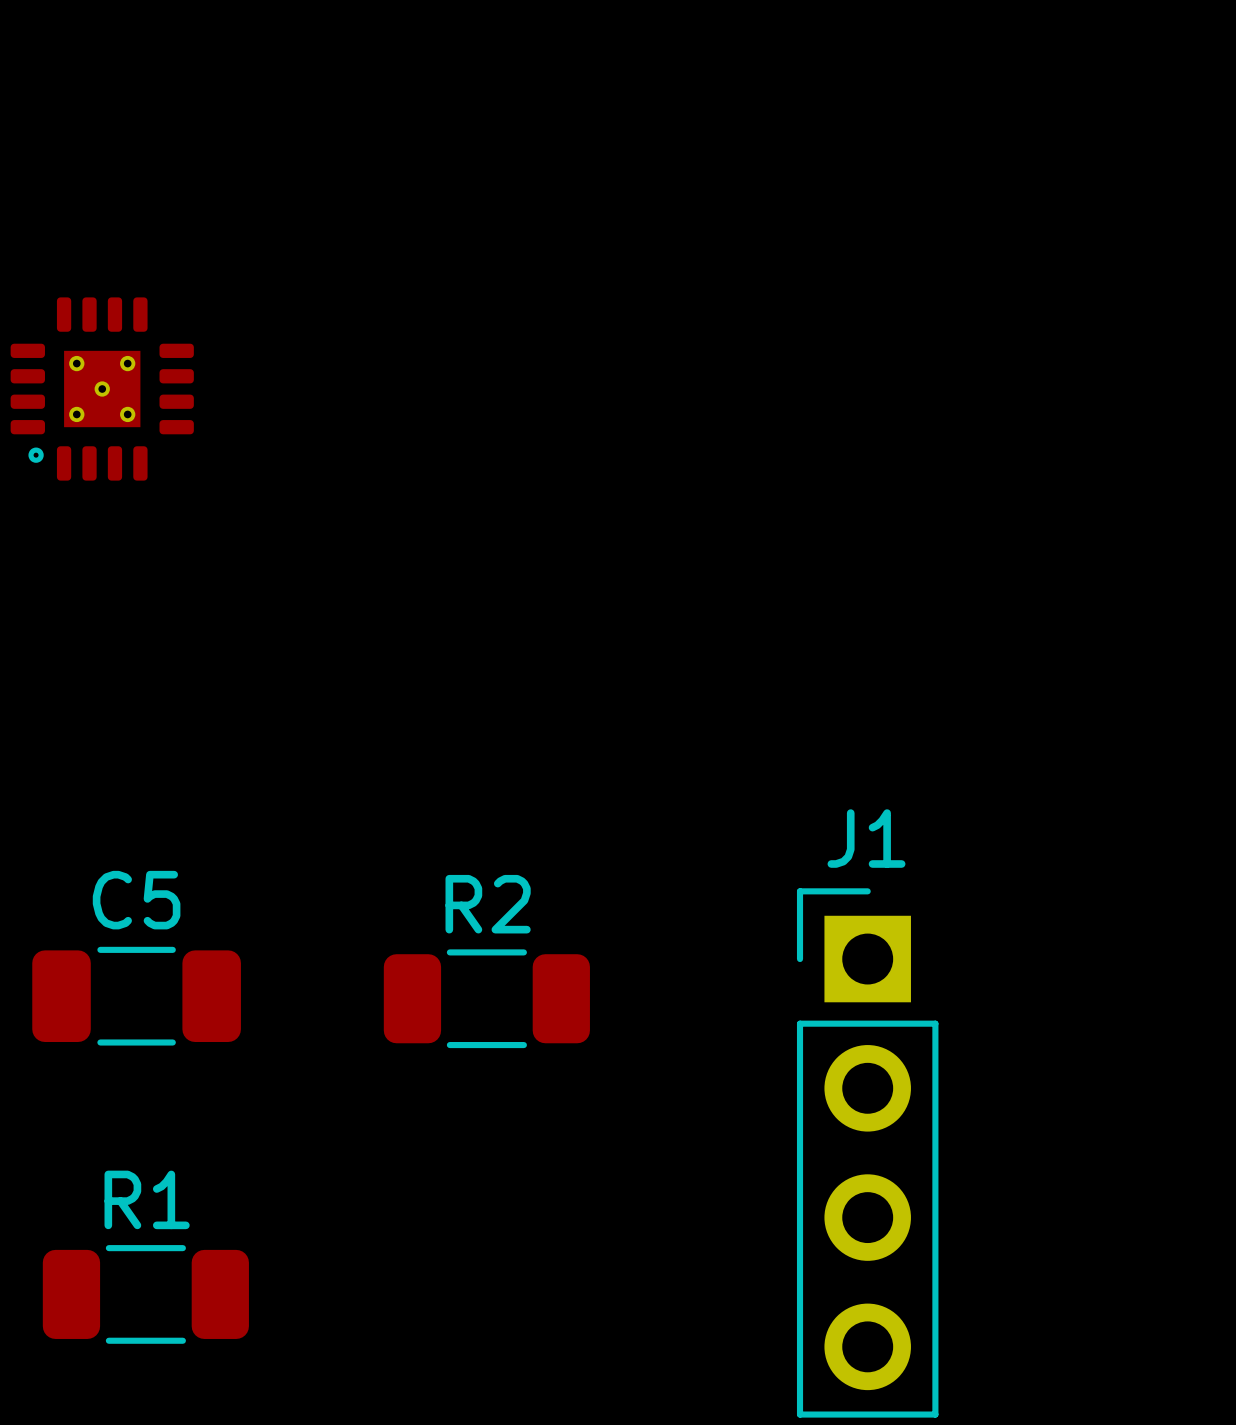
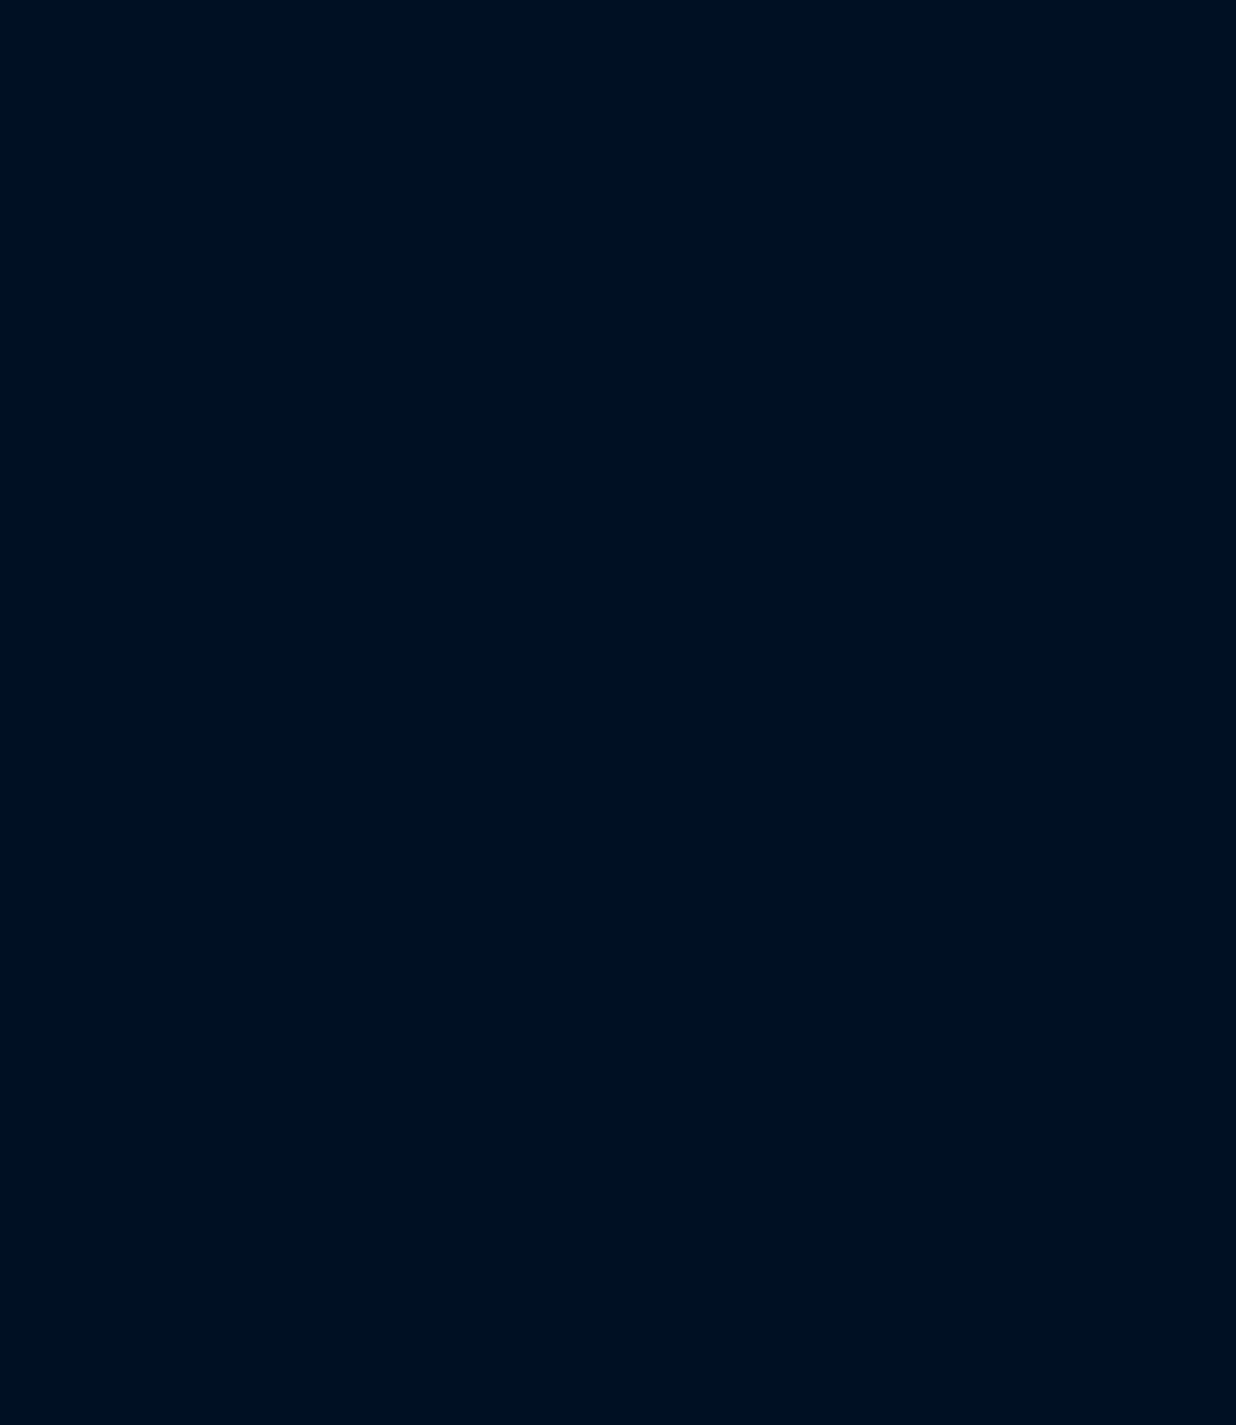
part: (102, 389) -> none
C5: (136, 996) -> none
R2: (486, 998) -> none
J1: (867, 1152) -> none
R1: (145, 1294) -> none

